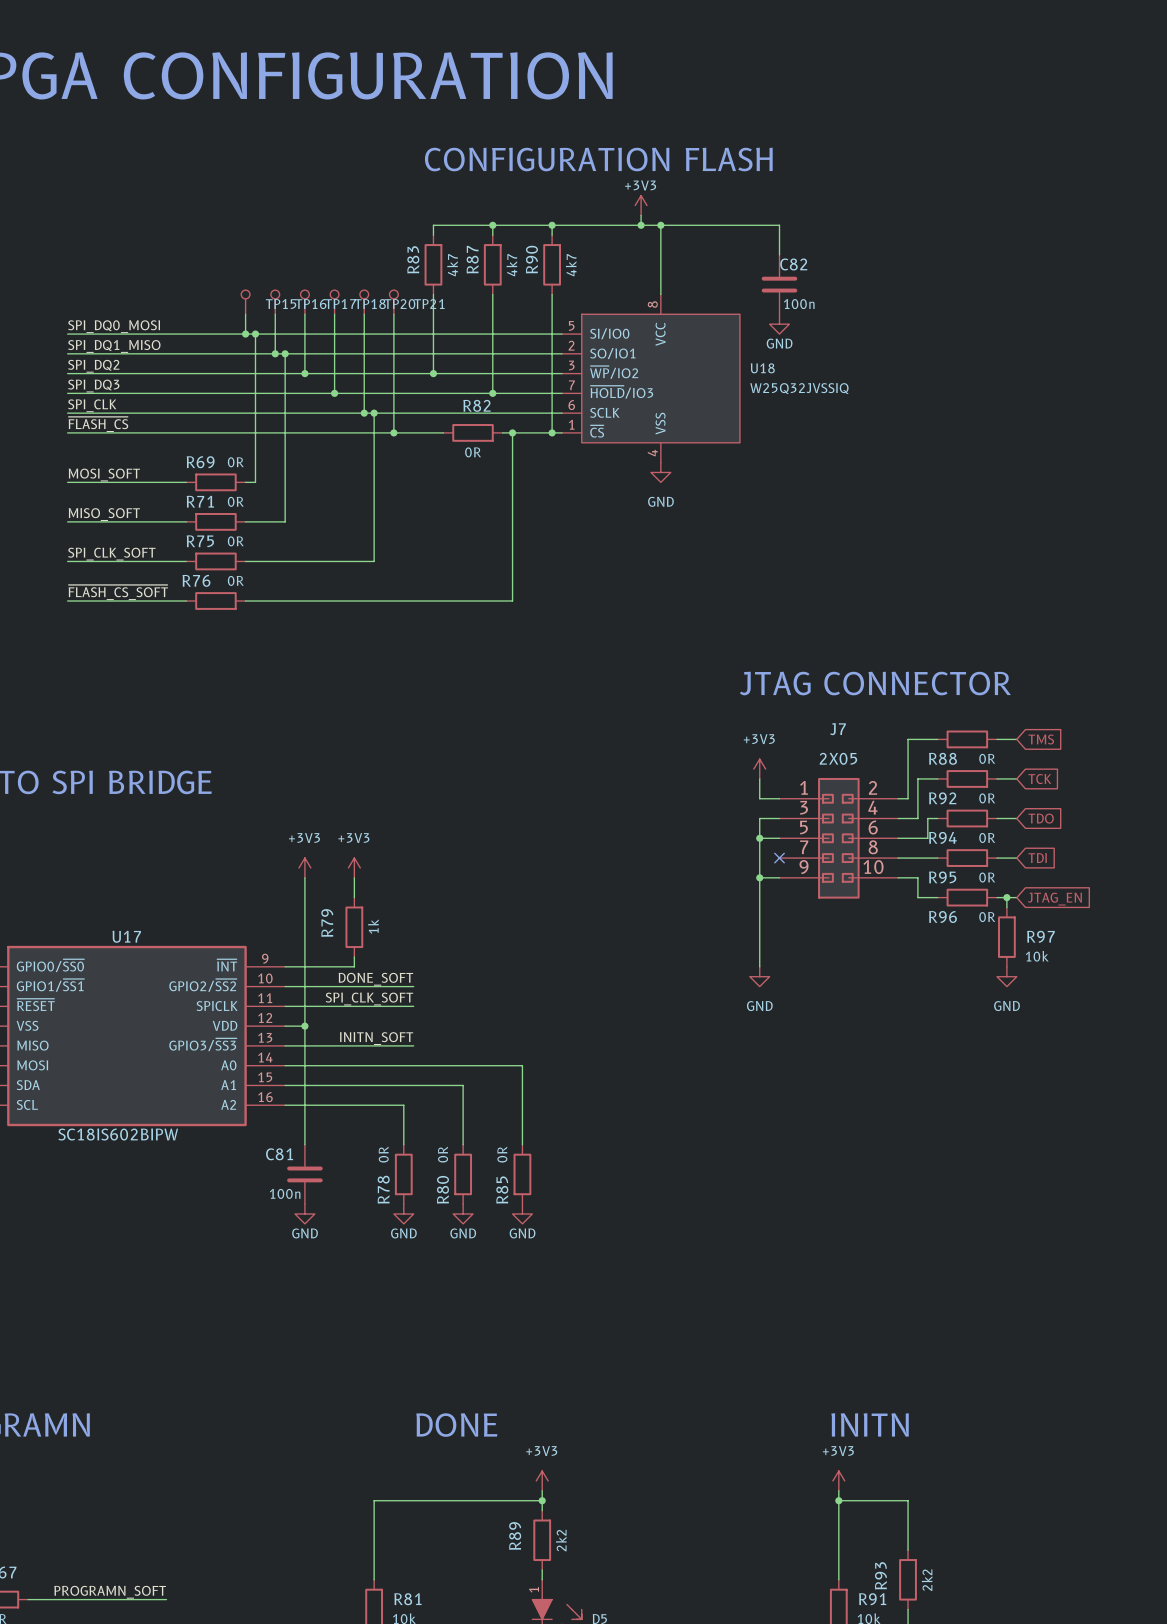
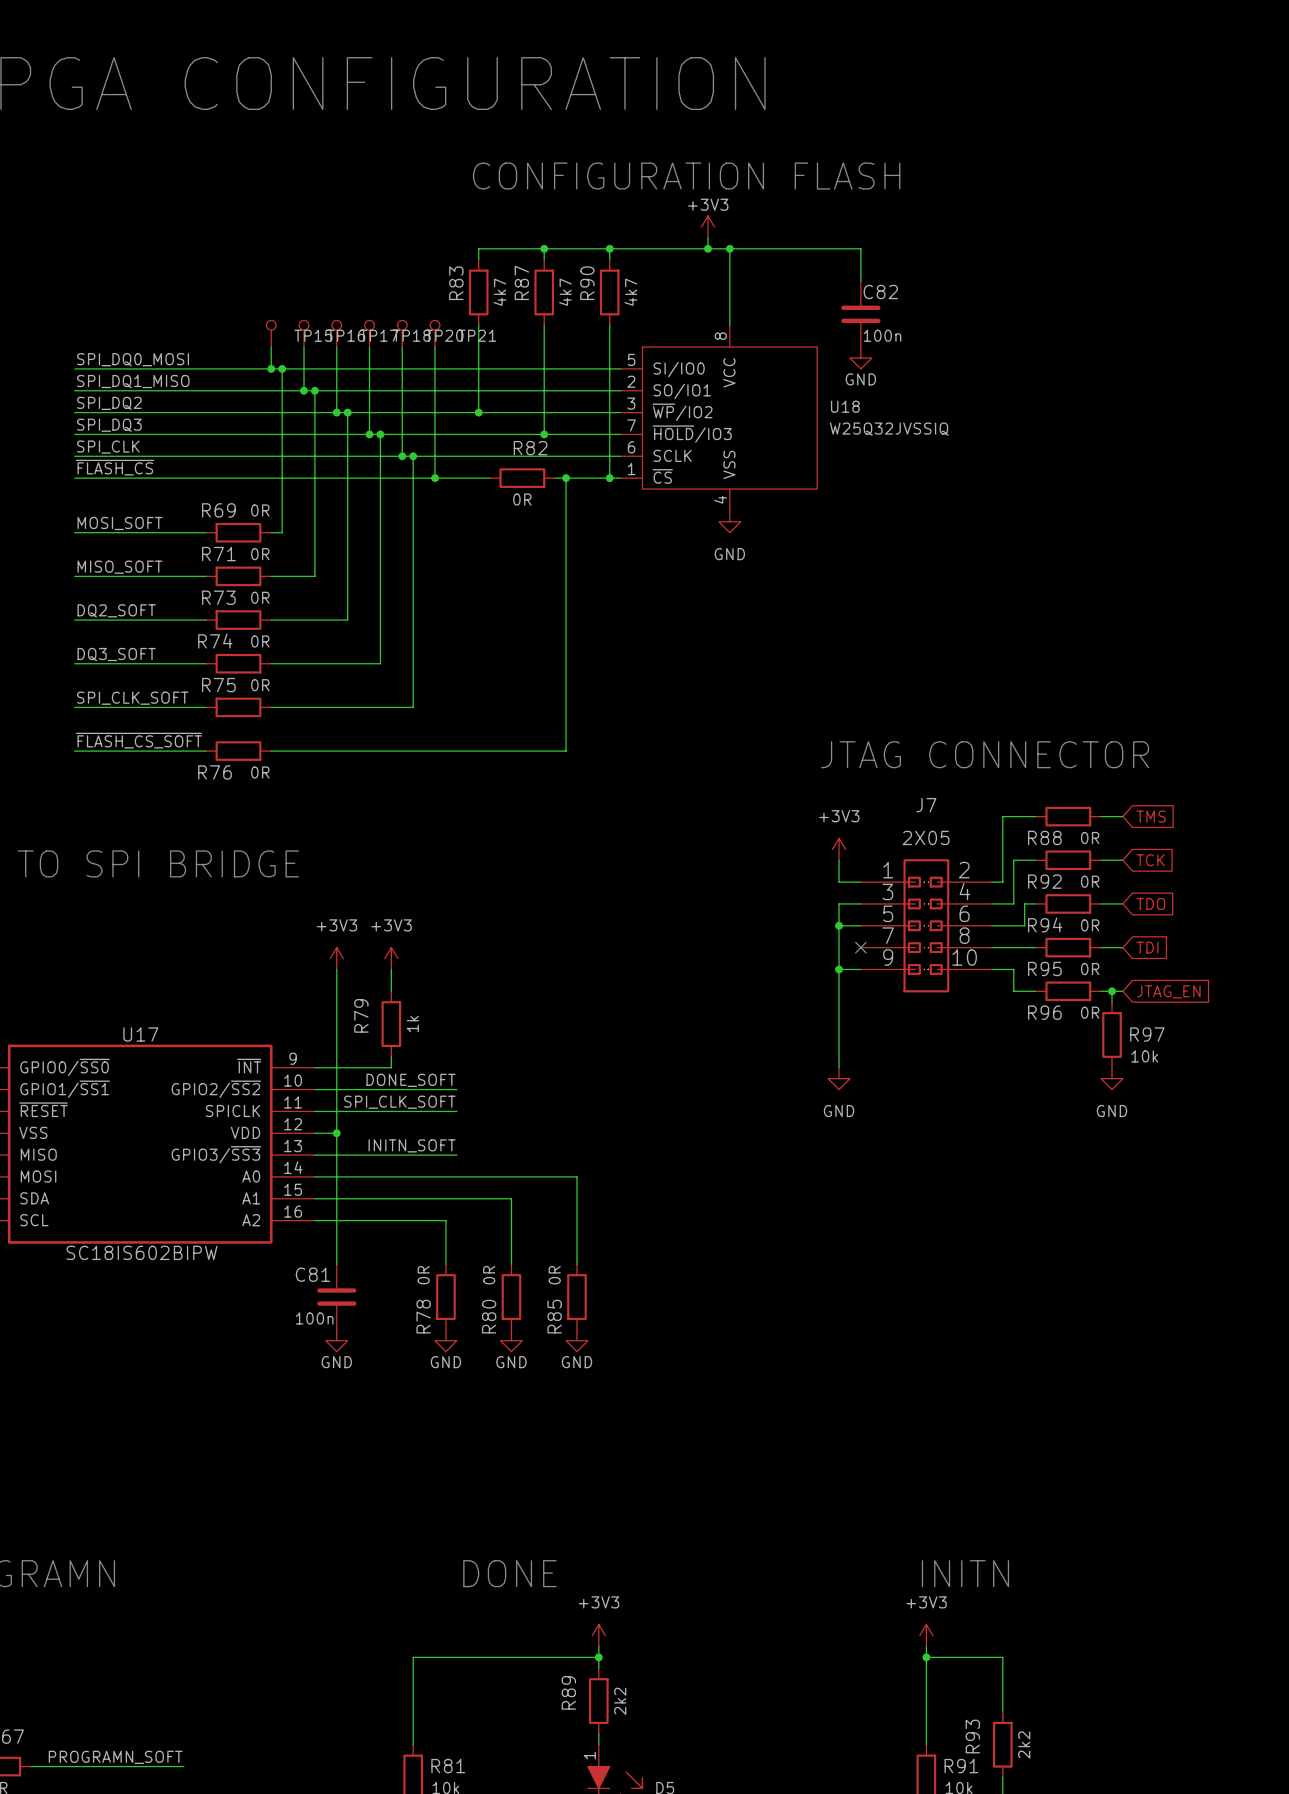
wire: none -> (347, 412) (347, 620)
junction: none -> (347, 412)
wire: none -> (380, 434) (380, 663)
junction: none -> (380, 434)
R75 name: R75 (200, 541) -> R73 (218, 597)
label: SPI_CLK_SOFT (111, 554) -> DQ2_SOFT (116, 610)
wire: (314, 561) (374, 561) -> (271, 707) (413, 707) (413, 620)
R76 name: R76 (196, 580) -> R74 (215, 641)
label: ~{FLASH_CS_SOFT} (118, 592) -> DQ3_SOFT (116, 654)
wire: (344, 601) (512, 601) -> (271, 751) (566, 751) (566, 663)
label: none -> SPI_CLK_SOFT (132, 698)
wire: none -> (74, 707) (205, 707)
R75: none -> (238, 707)
label: none -> ~{FLASH_CS_SOFT} (139, 740)
wire: none -> (74, 751) (205, 751)
R76: none -> (238, 751)

